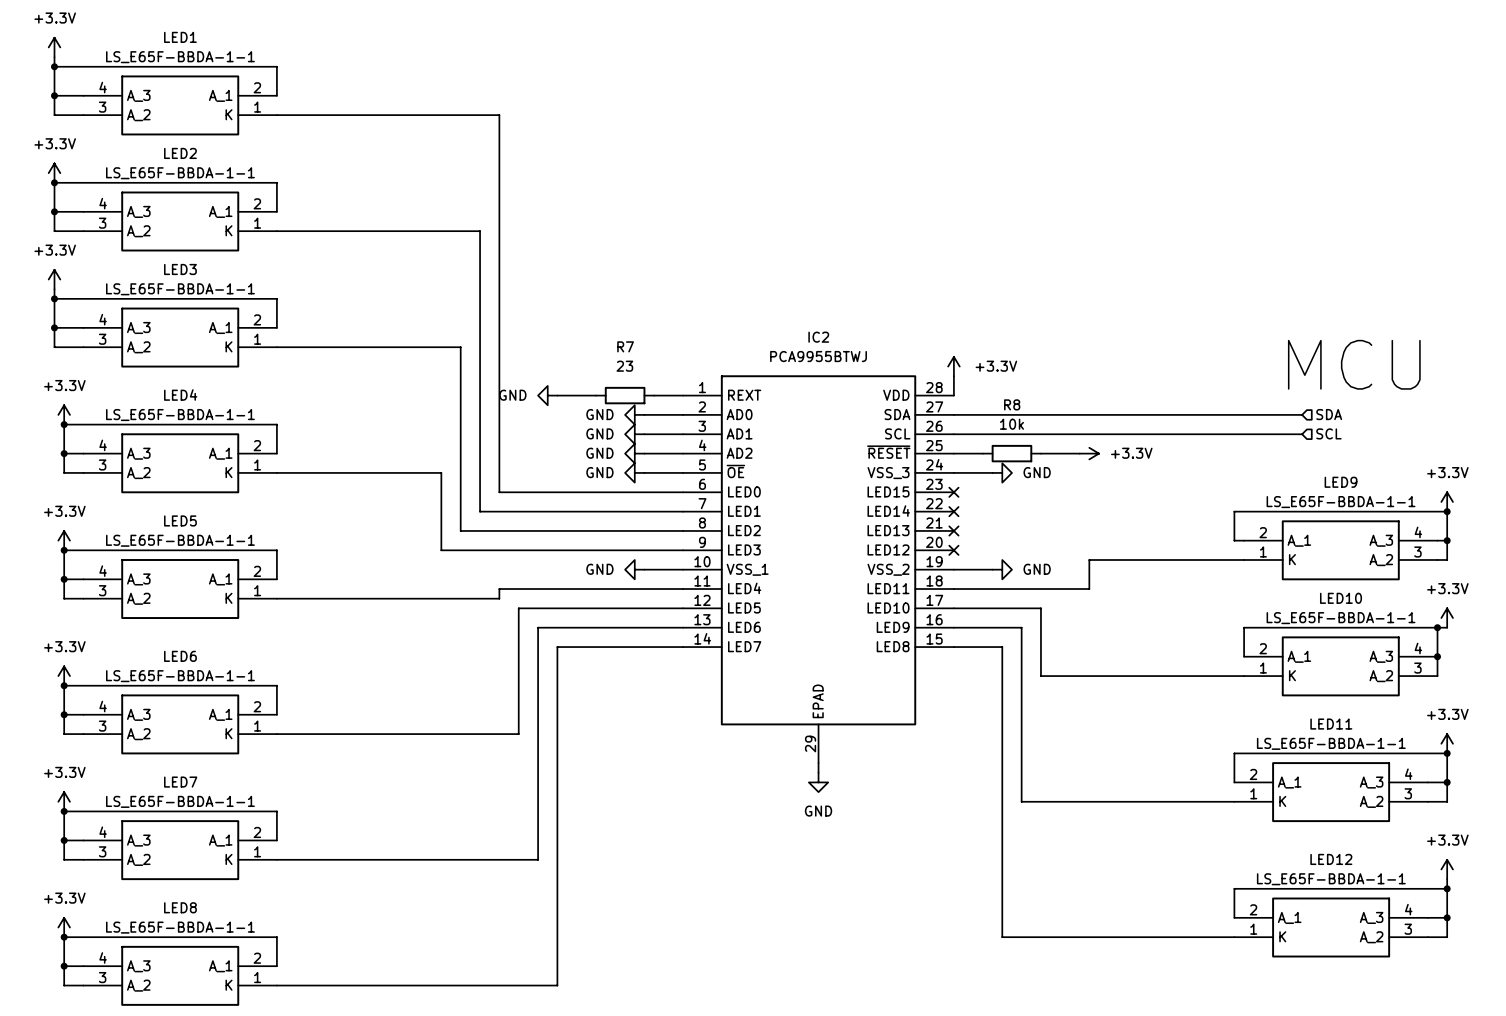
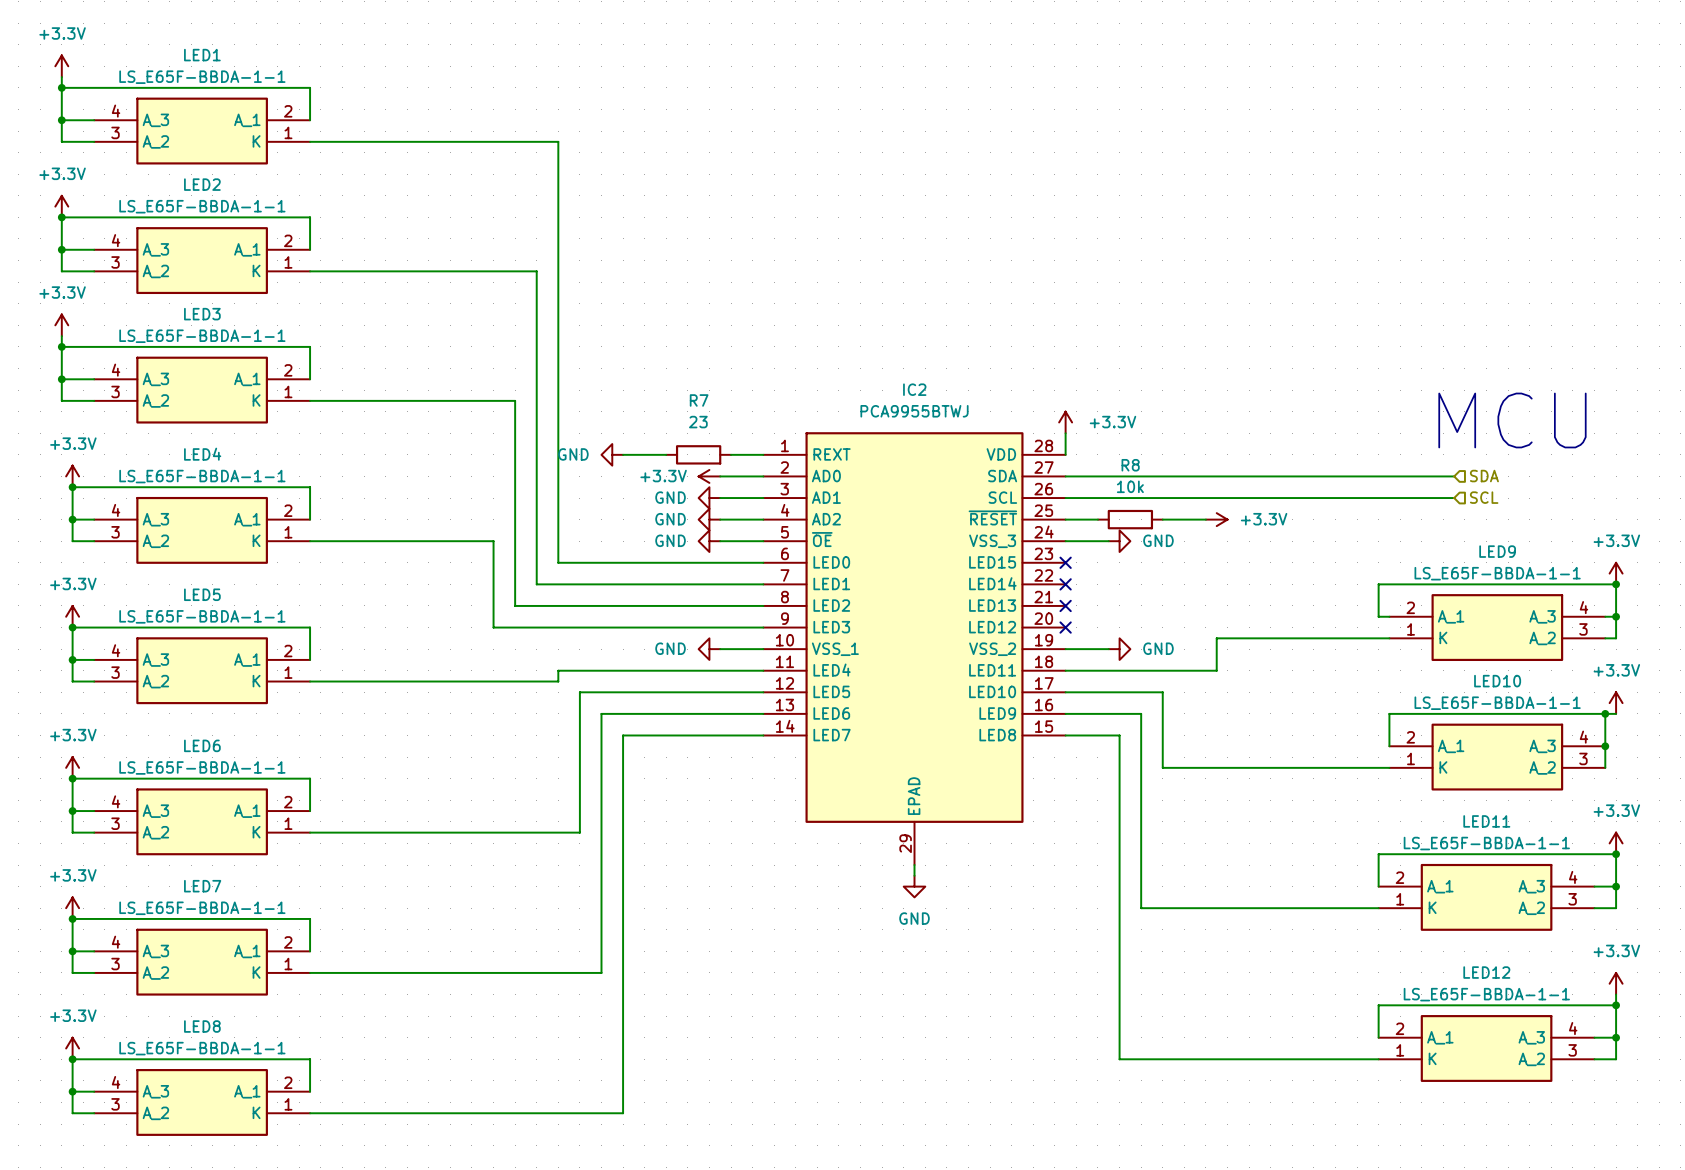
power symbol: GND (634, 414) -> +3.3V (709, 476)

